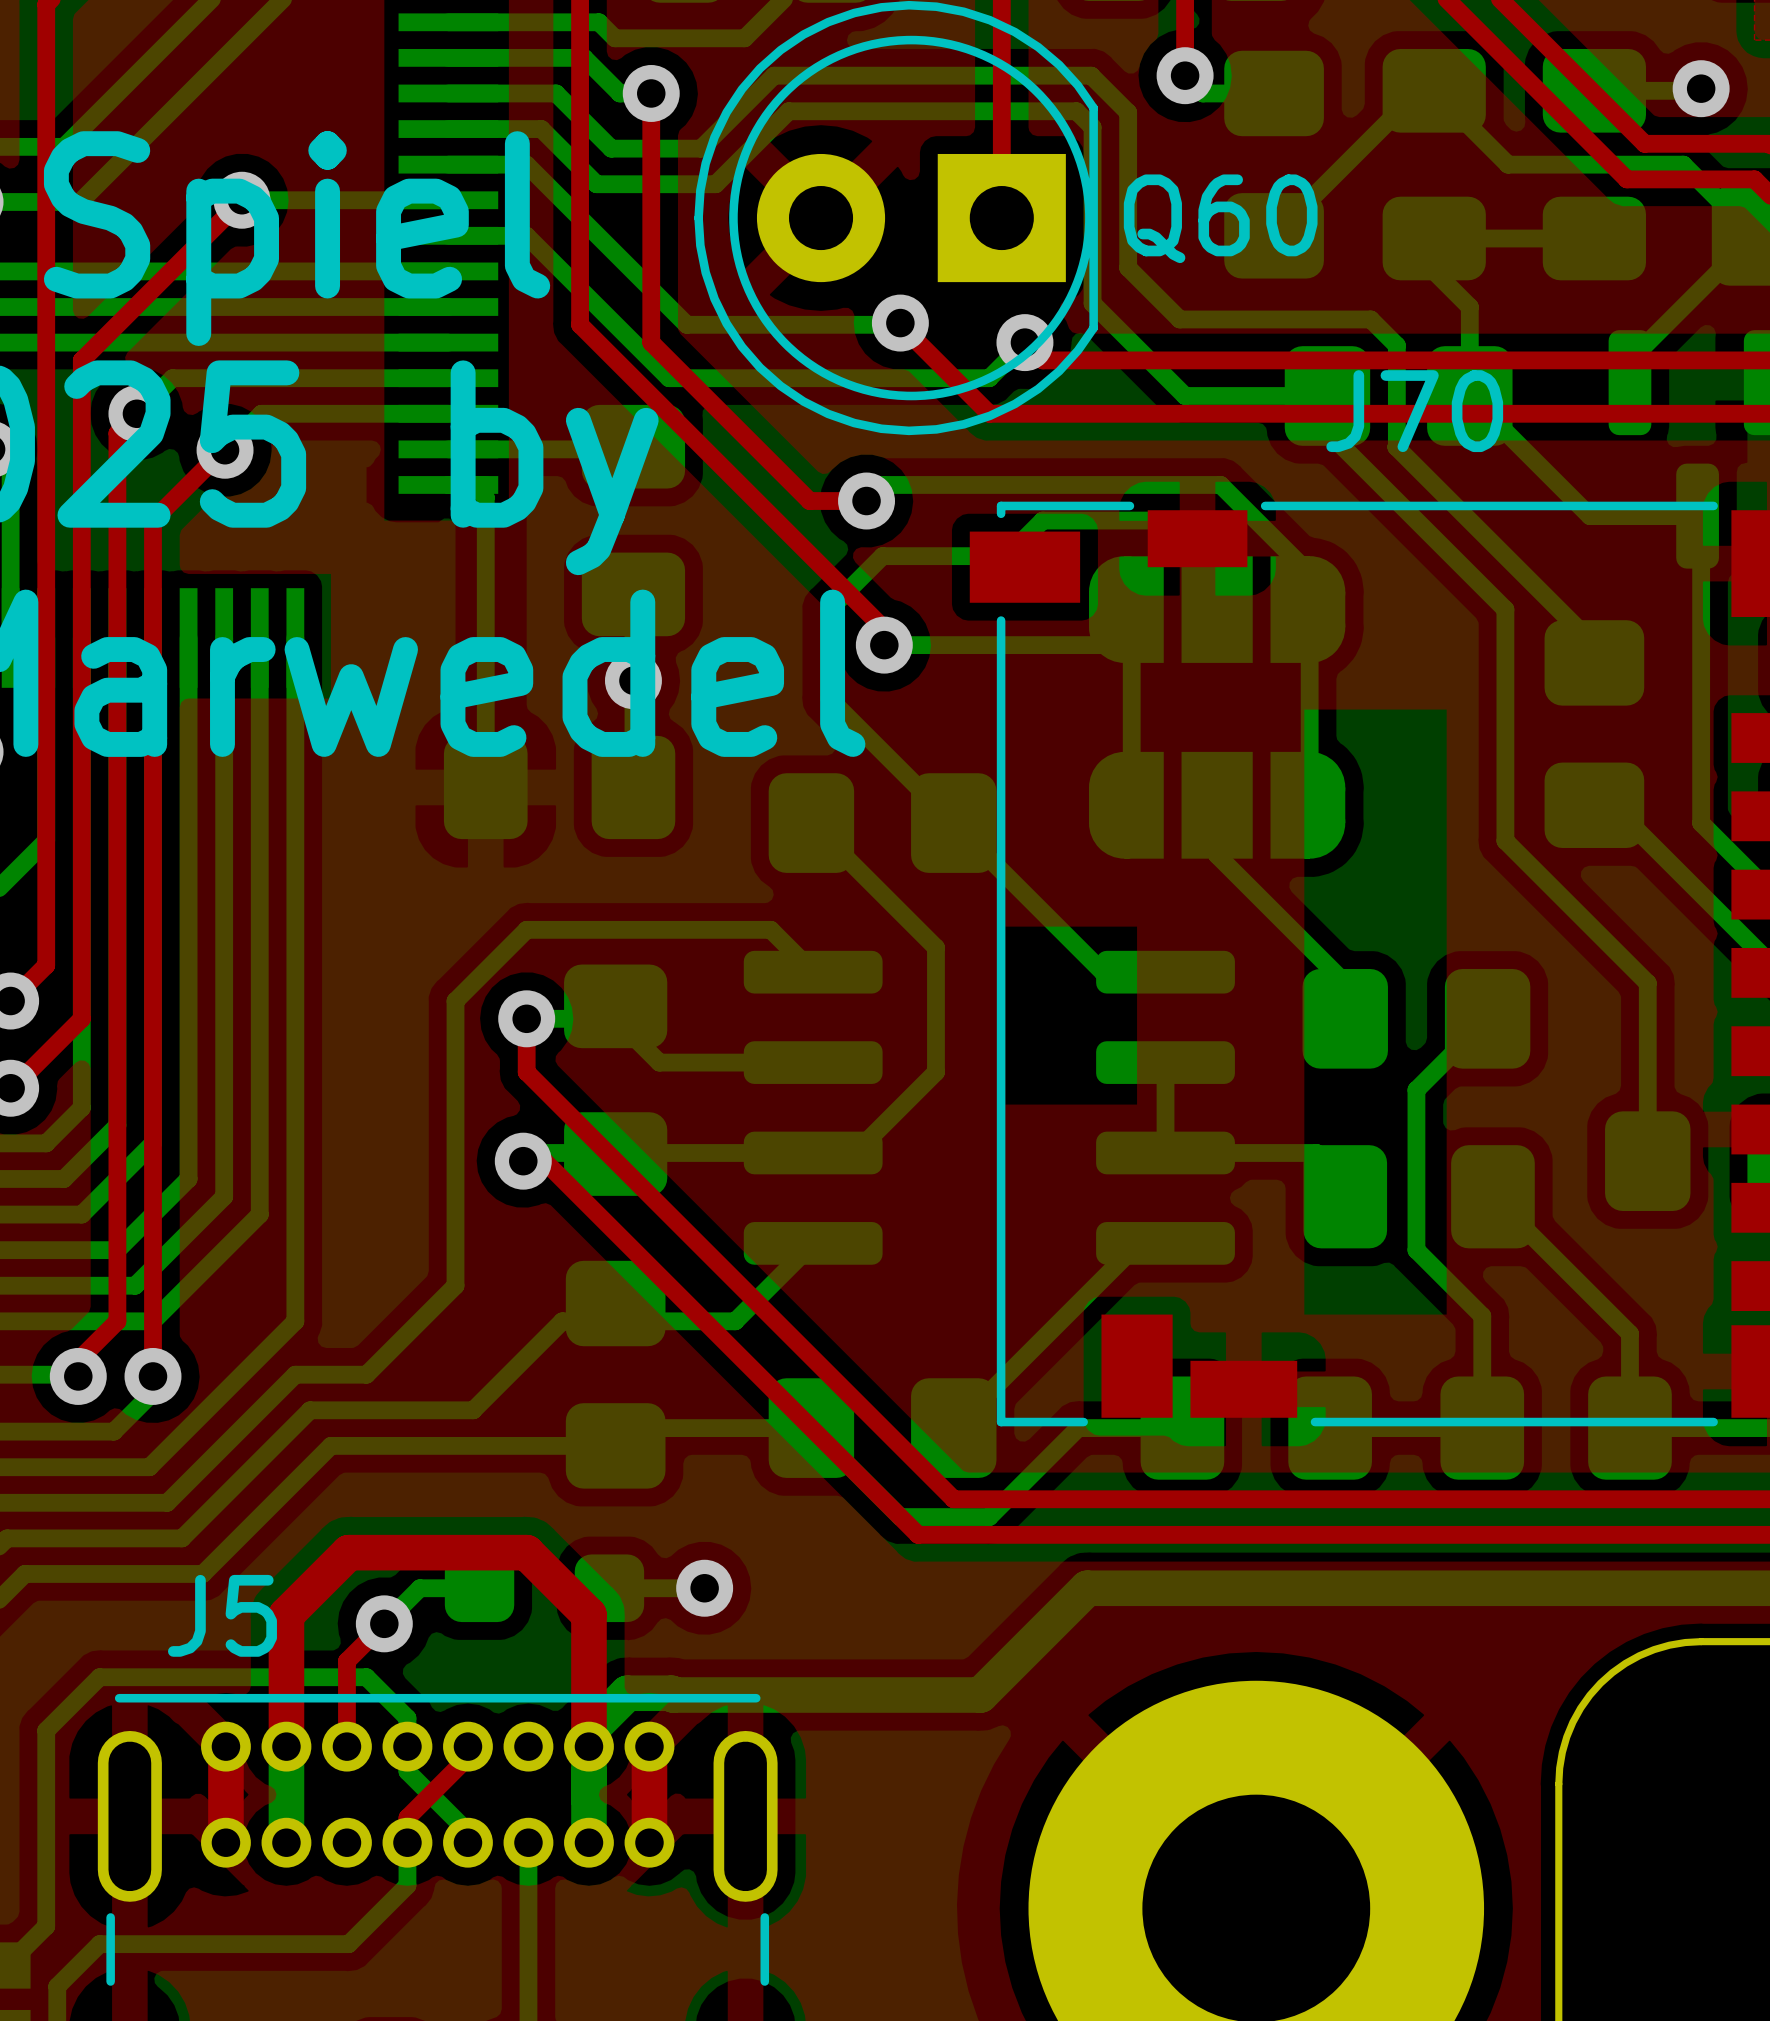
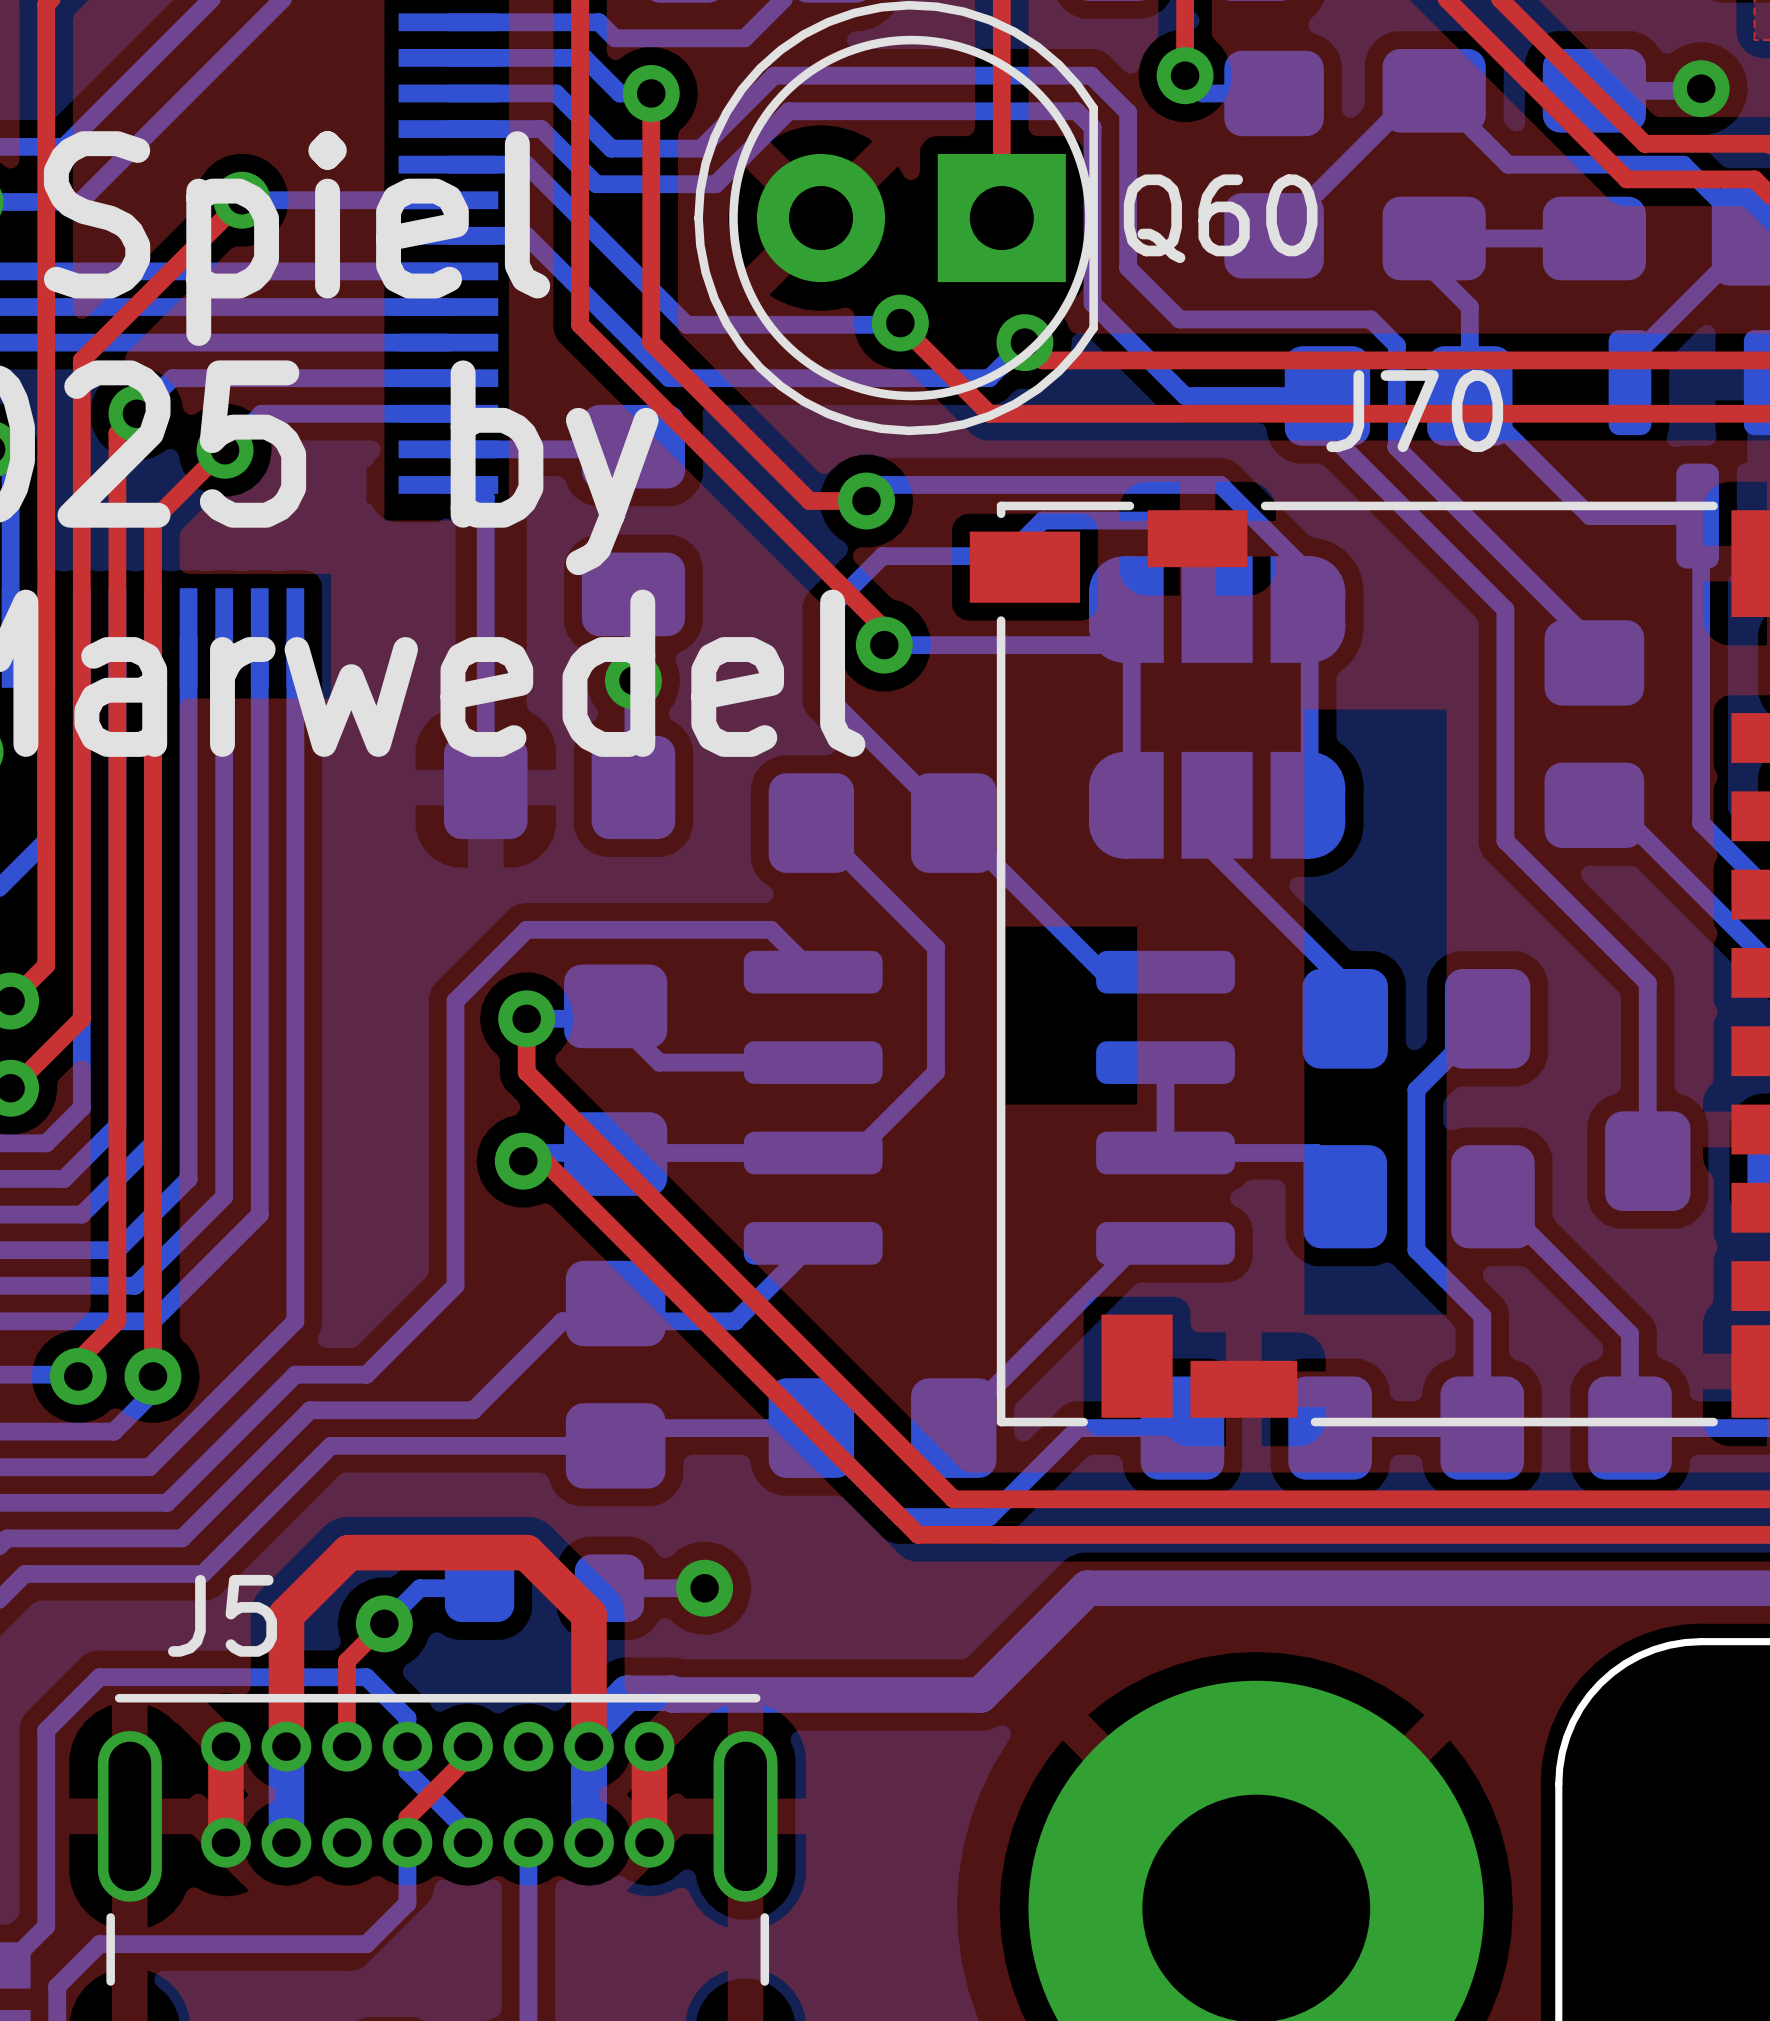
bottom track: (407, 1885) (348, 1944) -> (407, 1885) (407, 1903) (366, 1944) (348, 1944)

